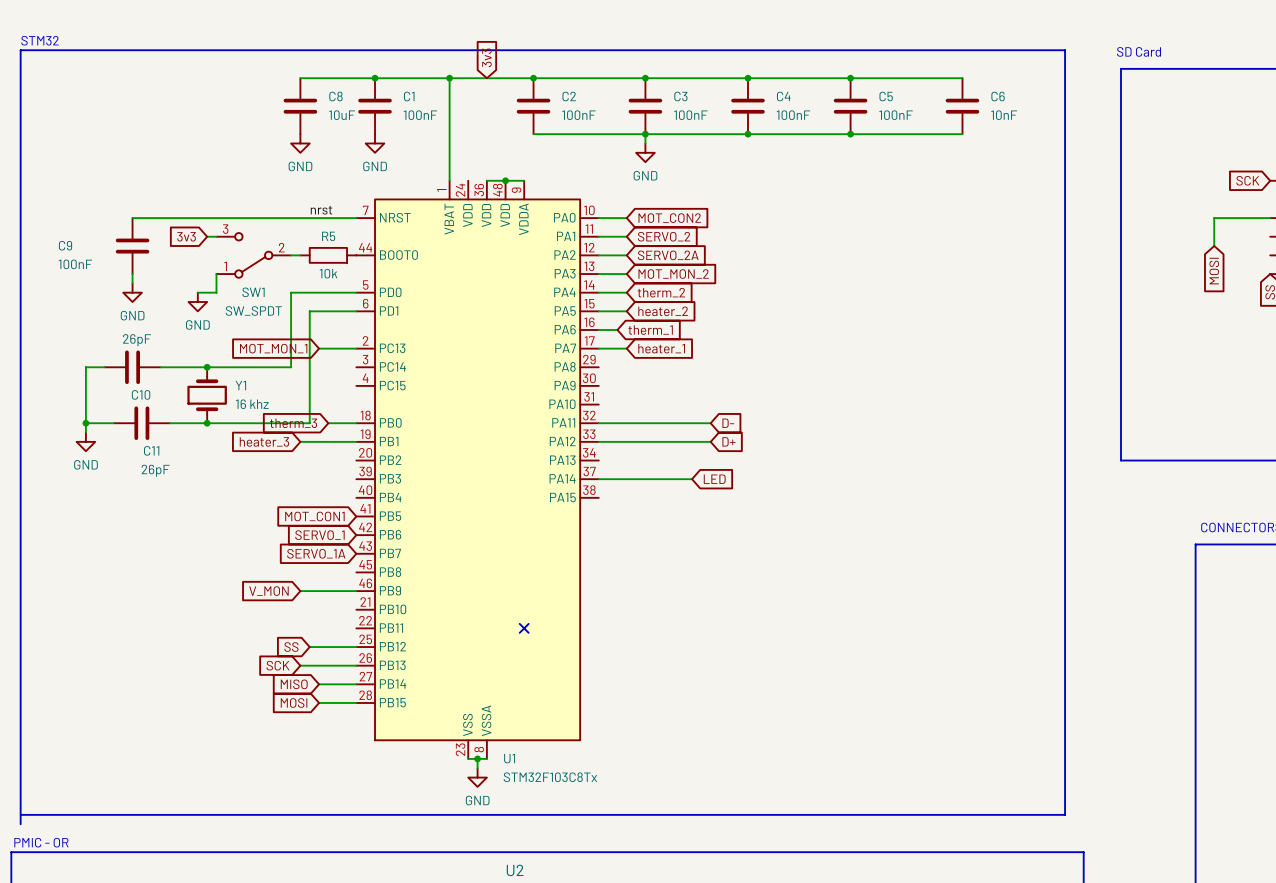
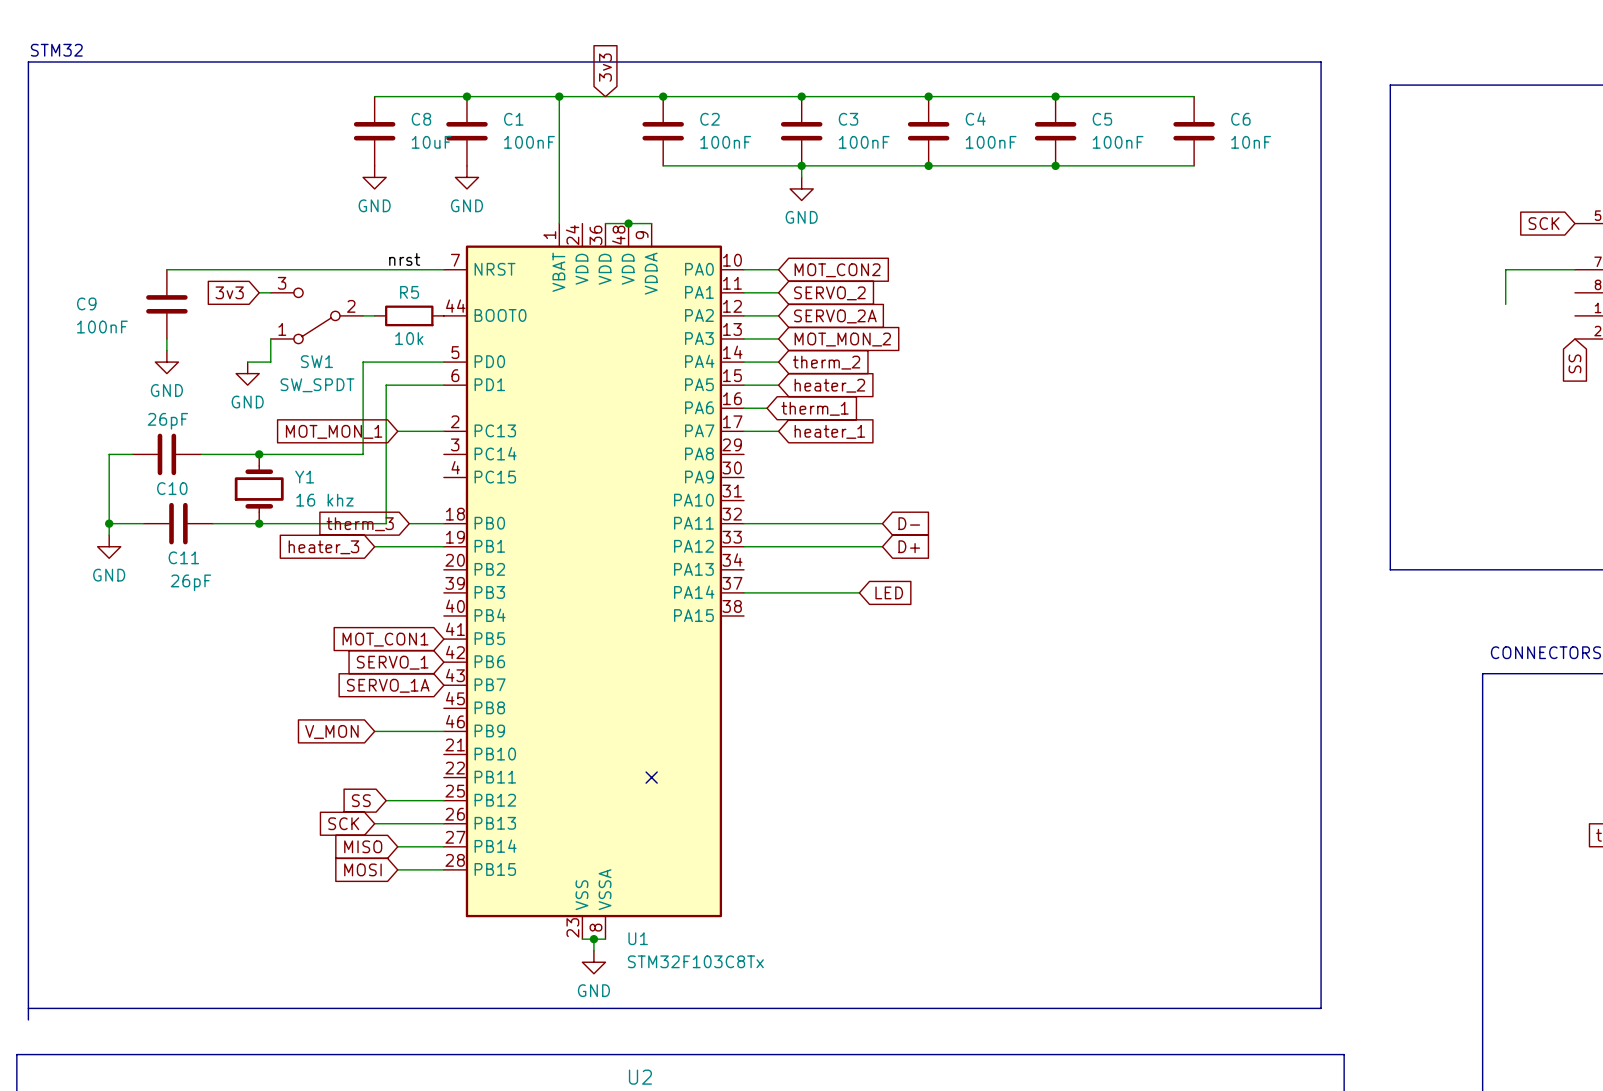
text: SD Card (1138, 51) -> none
global label: MOSI (1214, 271) -> none
text: PMIC - OR (41, 842) -> none

